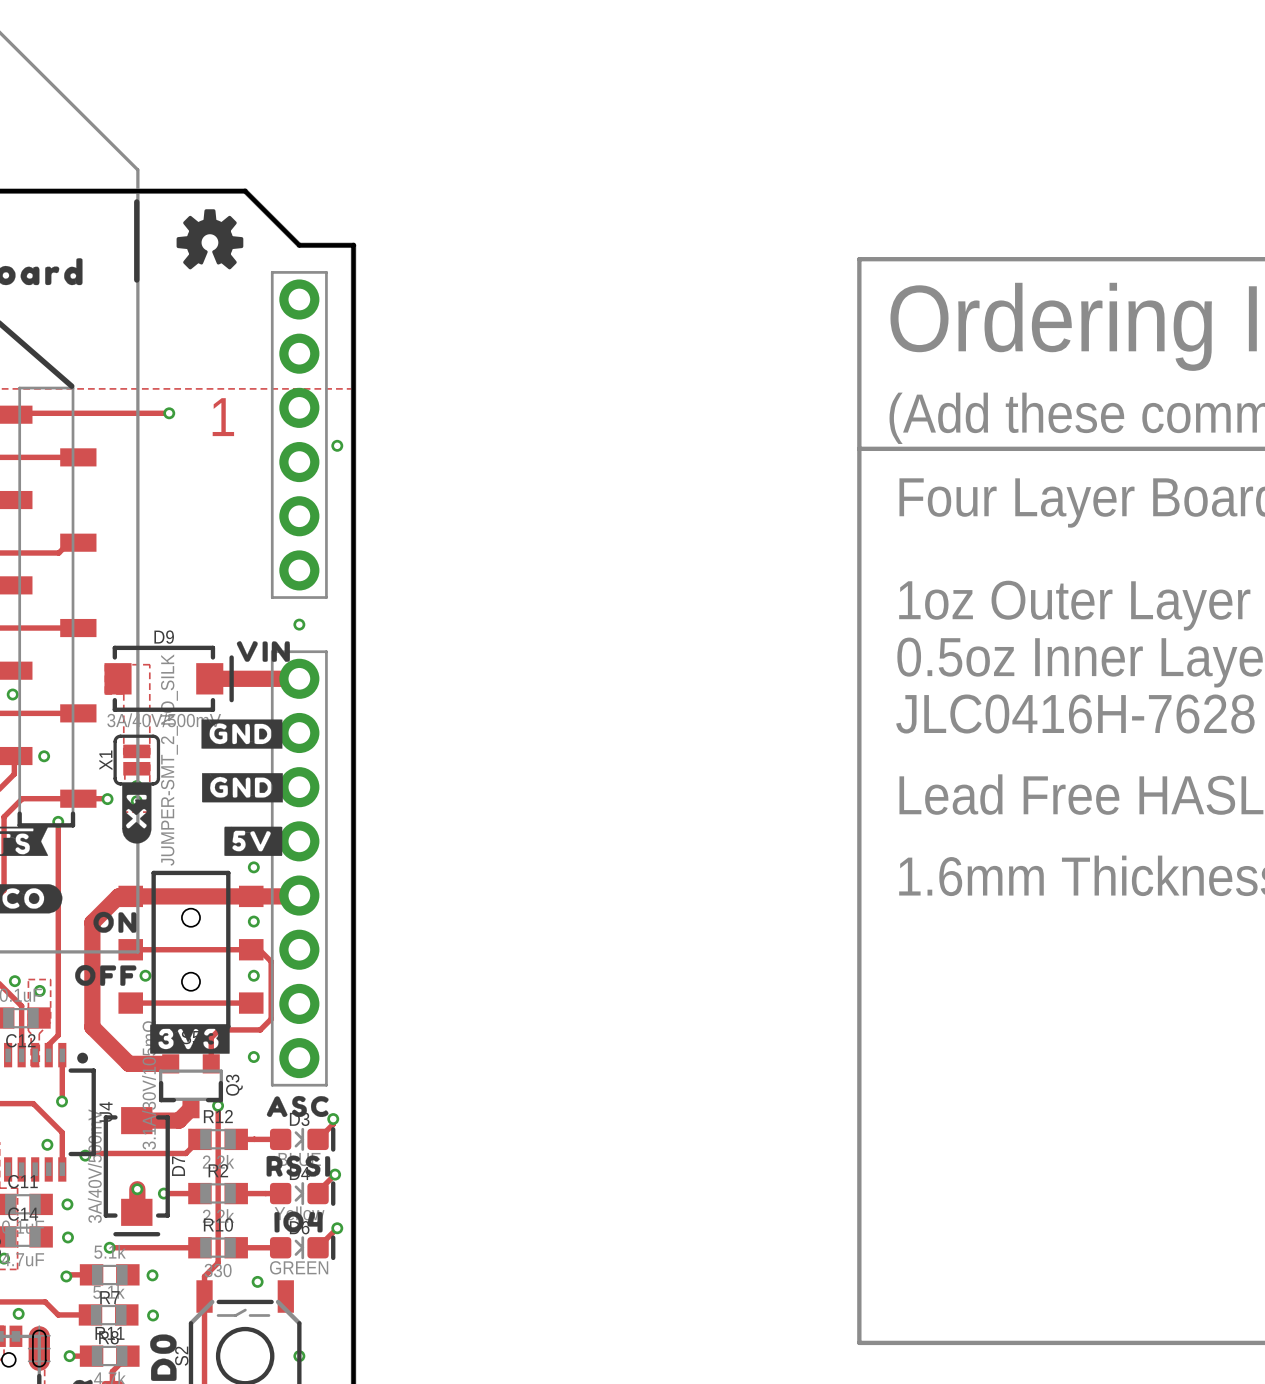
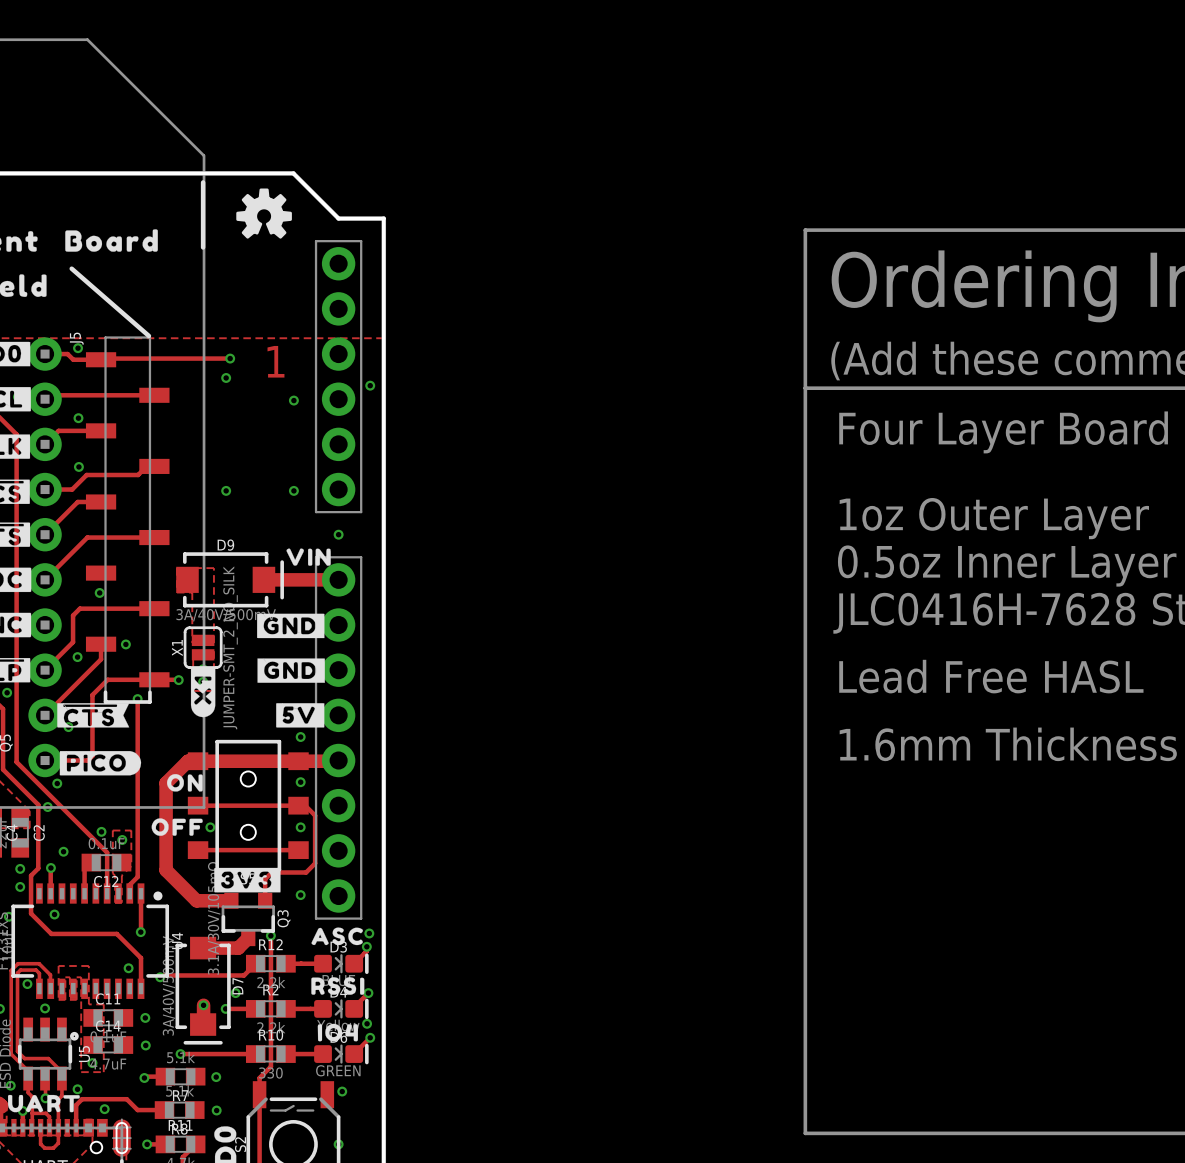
via: none -> (226, 377)
via: none -> (293, 400)
via: none -> (226, 490)
via: none -> (293, 490)
via: none -> (369, 933)
via: none -> (235, 993)
via: none -> (367, 1023)
via position: (257, 1281) -> (342, 1091)

